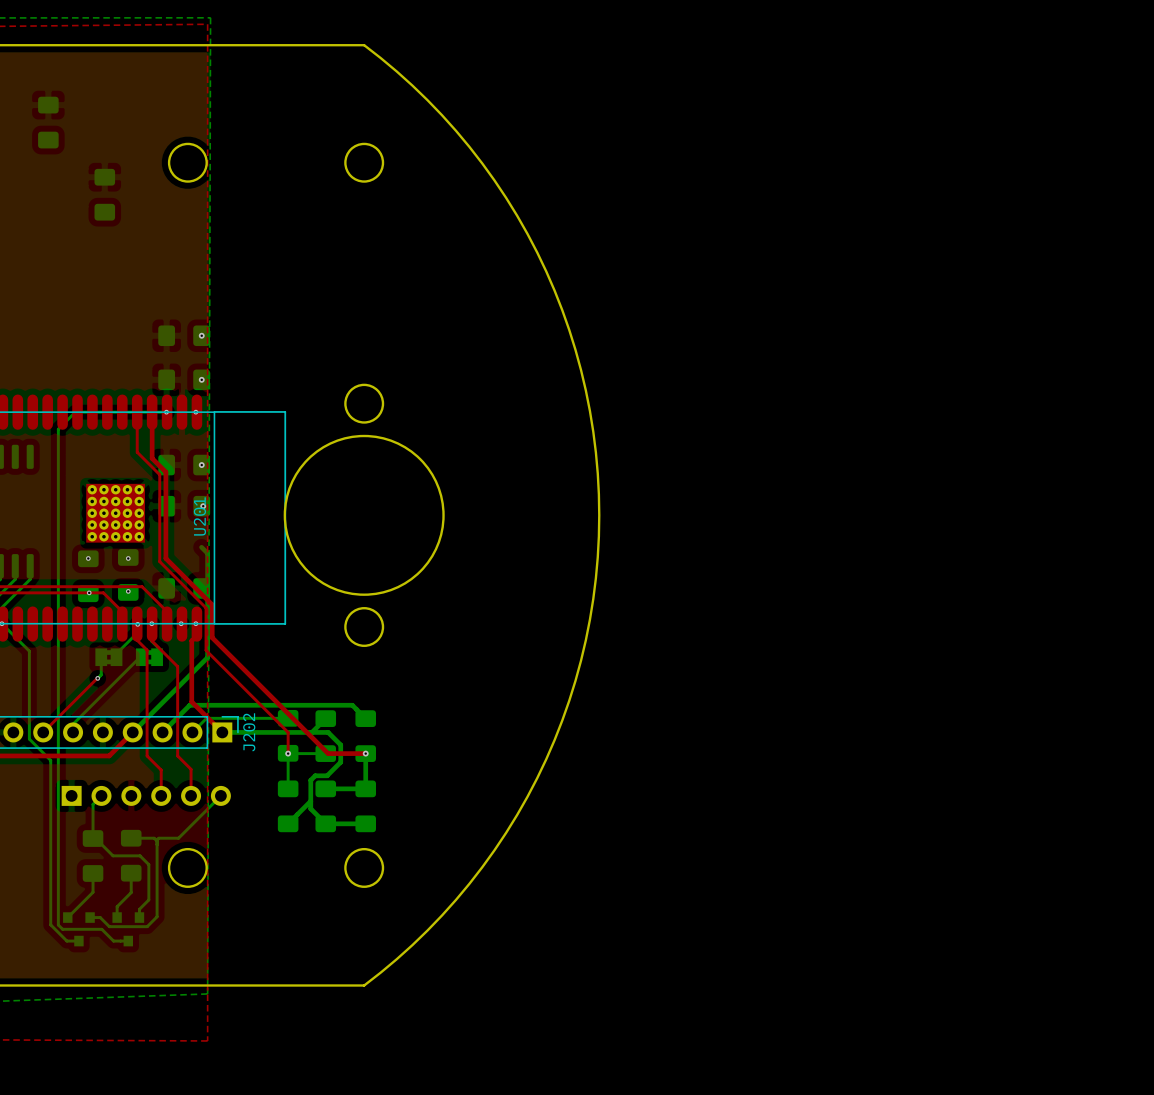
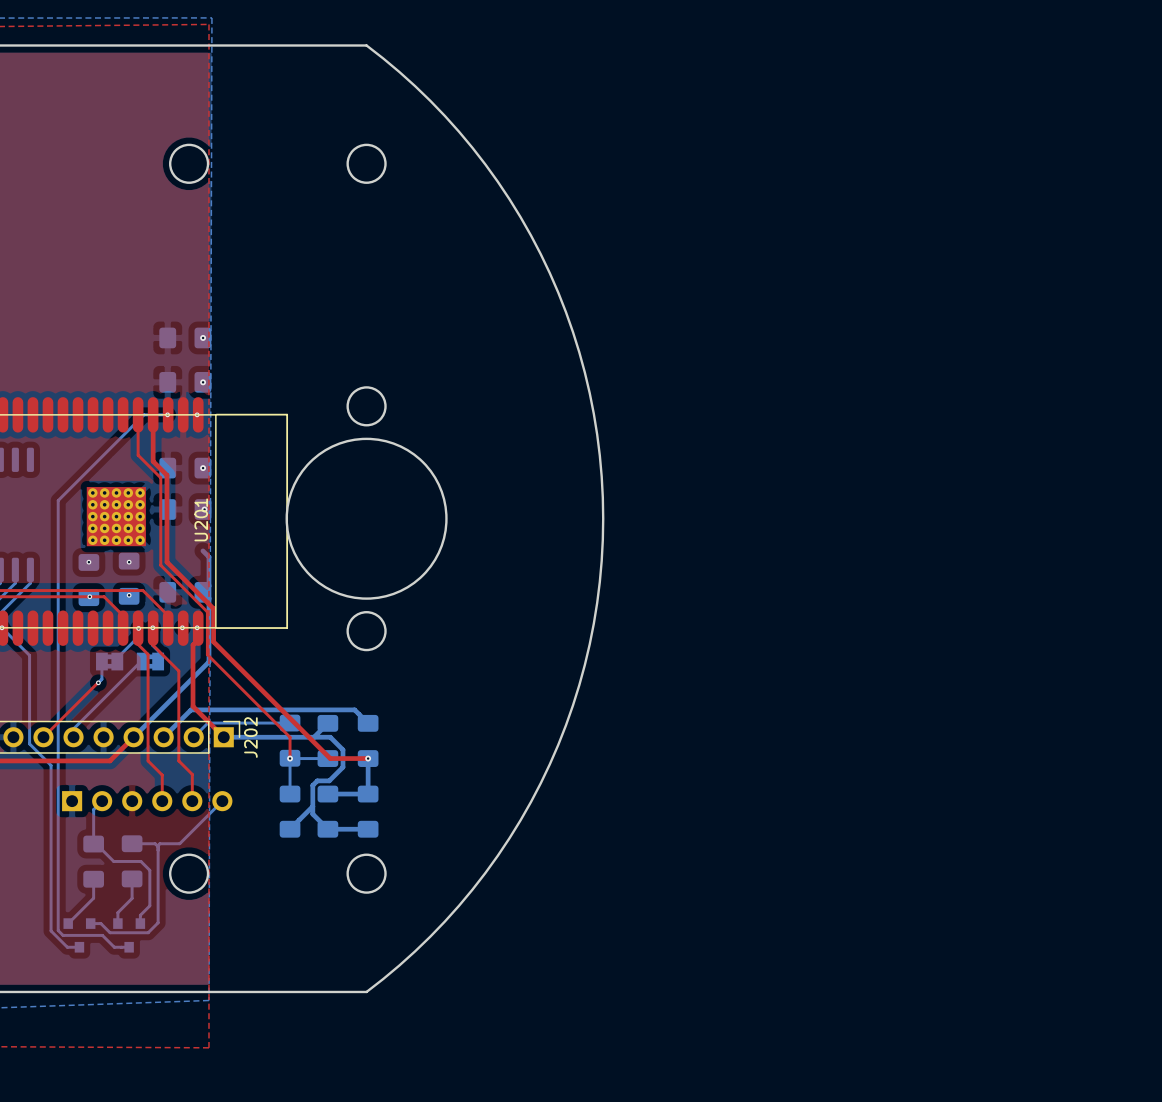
part: (48, 122) -> none
part: (104, 194) -> none
bottom track: (142, 412) (75, 412) (58, 429) (58, 925) -> (143, 414) (58, 500) (58, 931)

